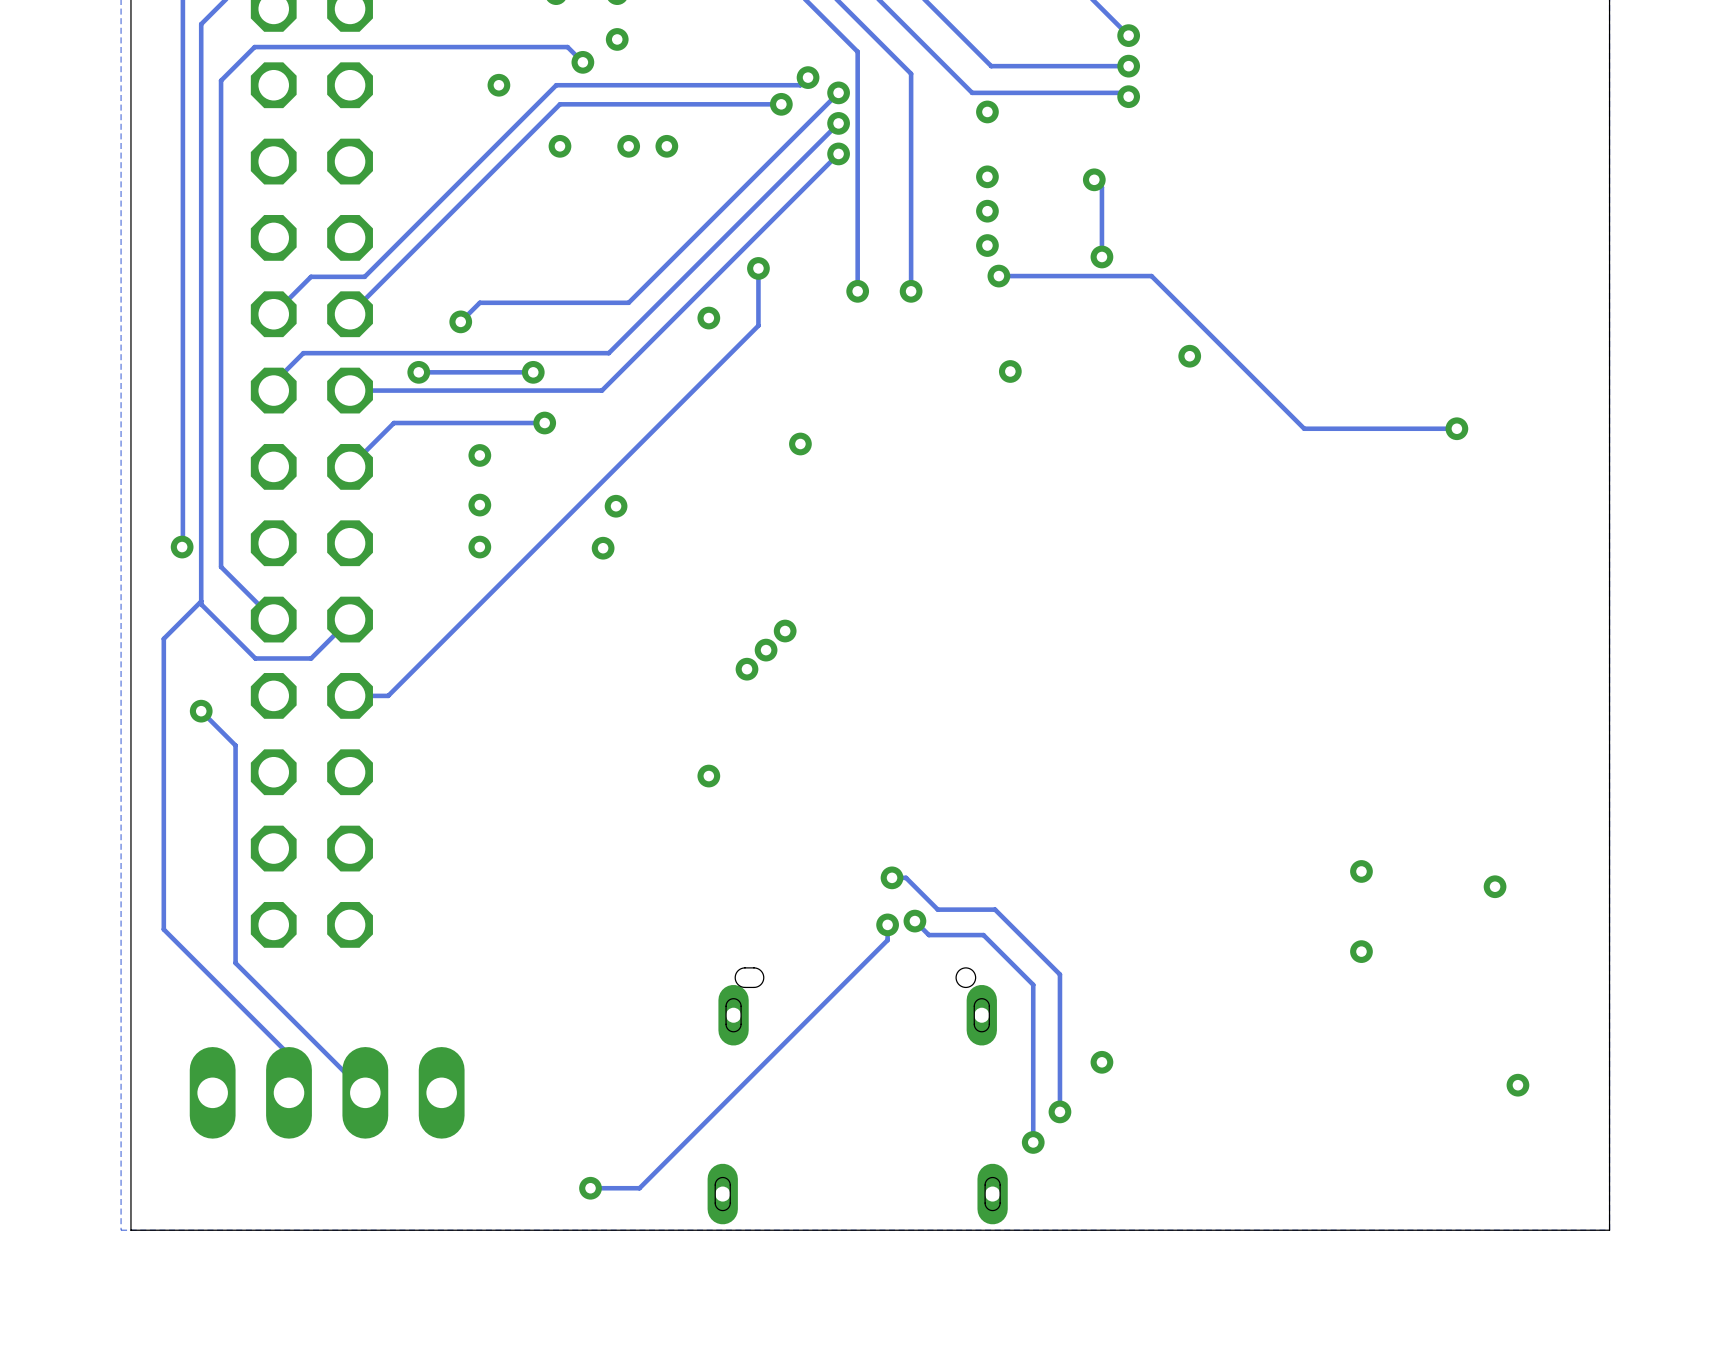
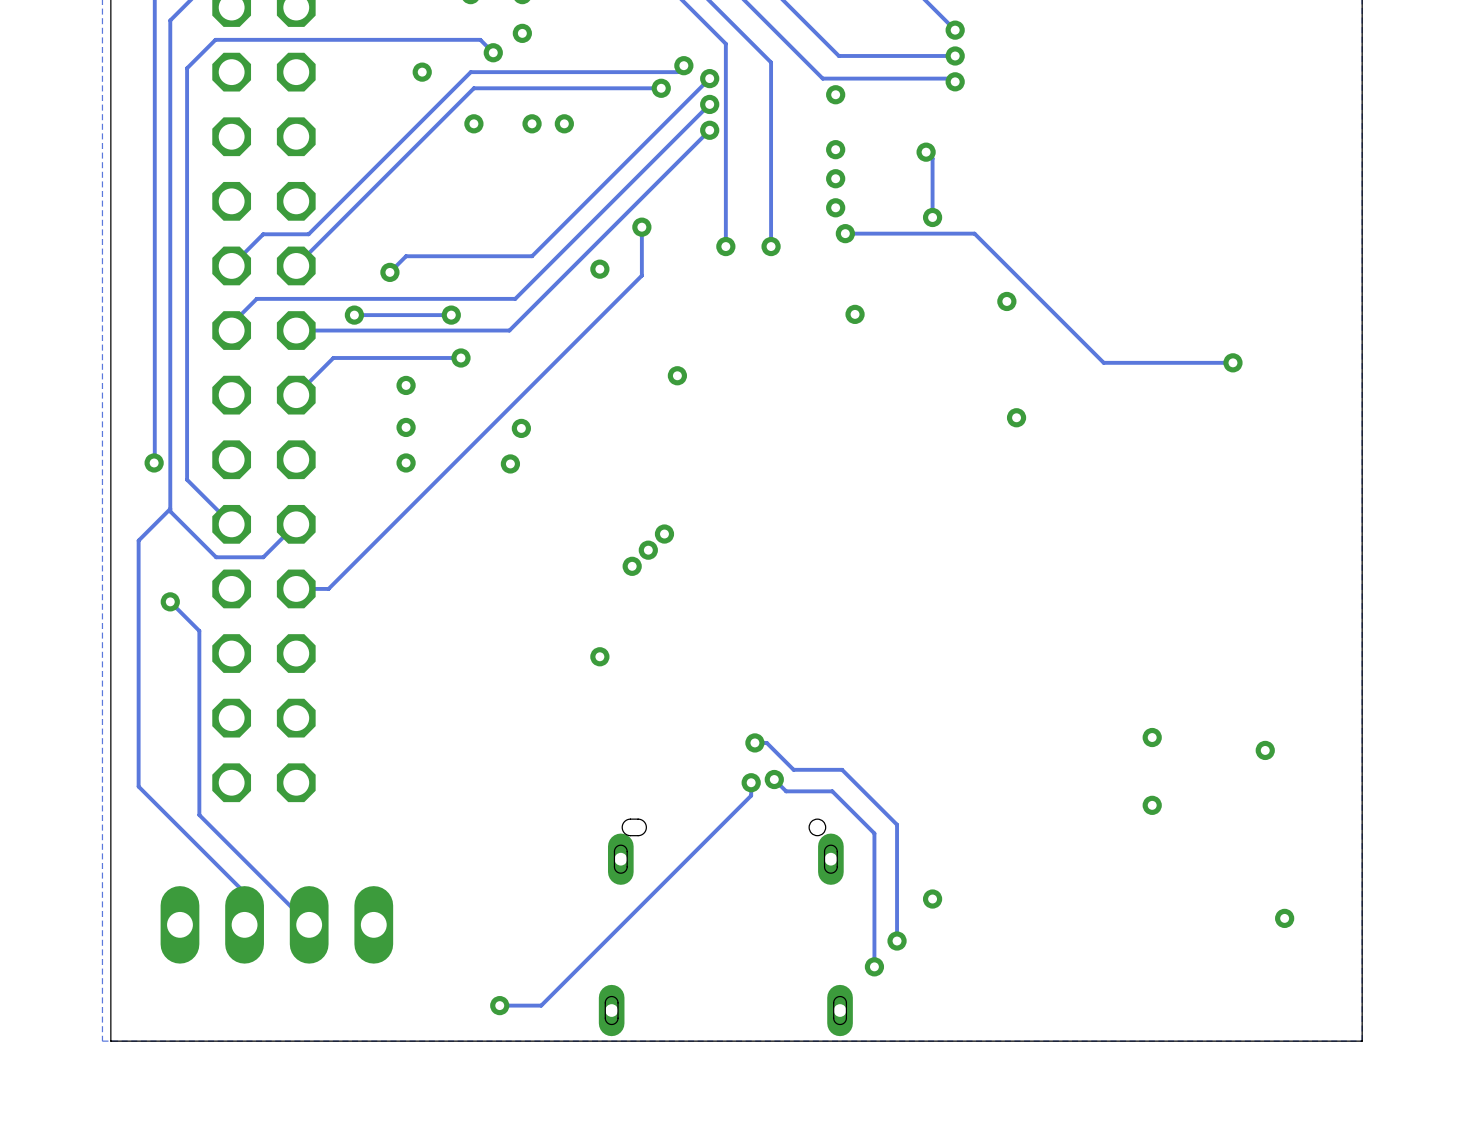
via: none -> (1016, 417)

